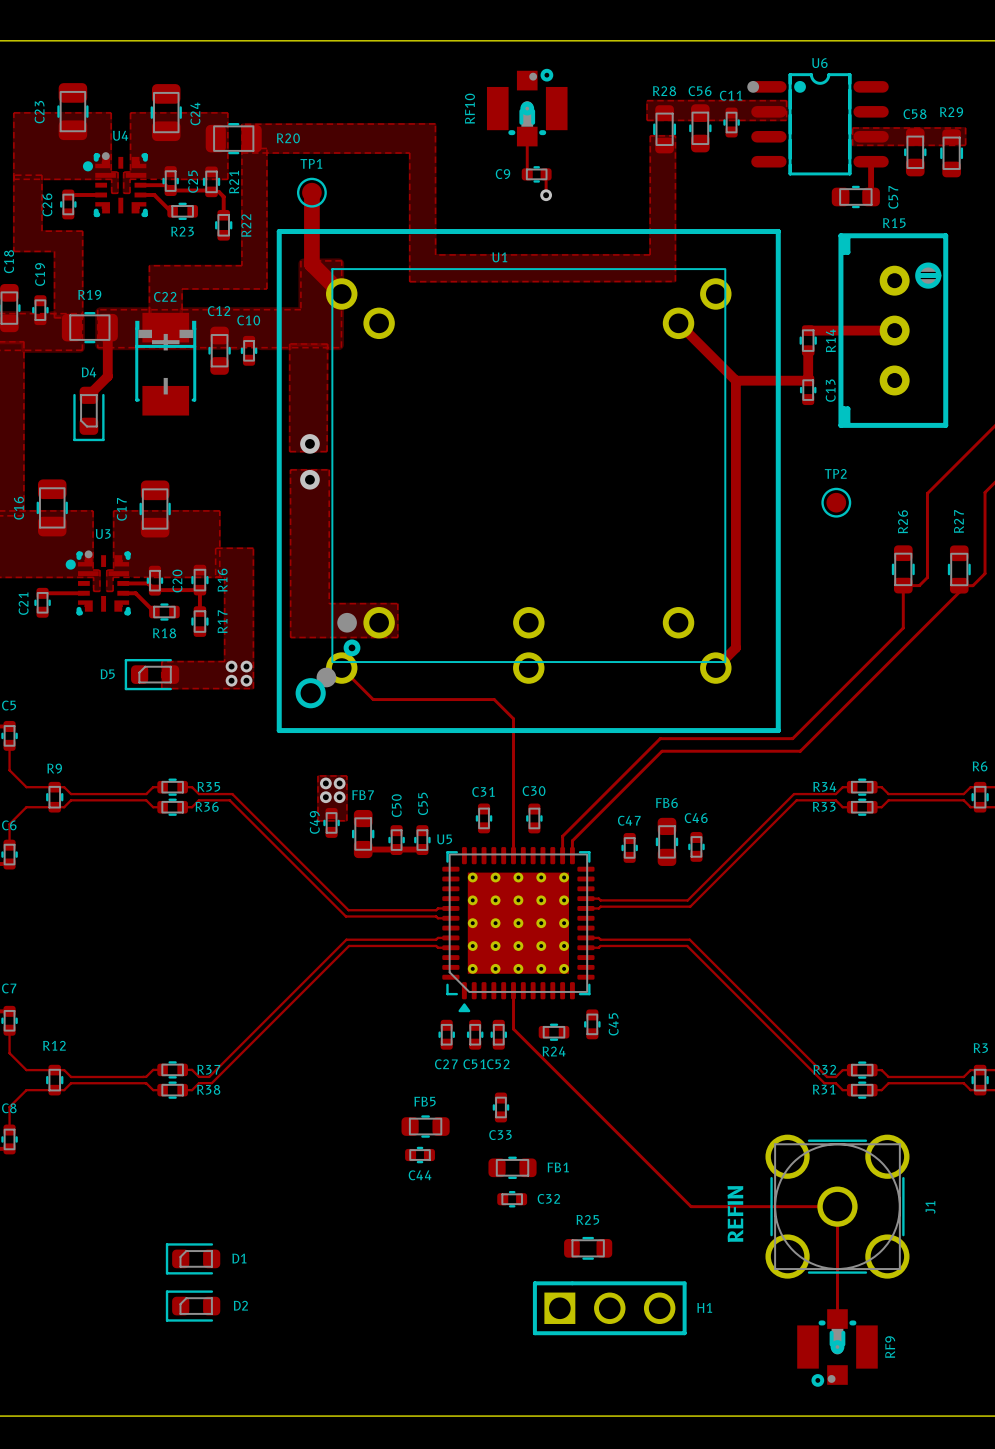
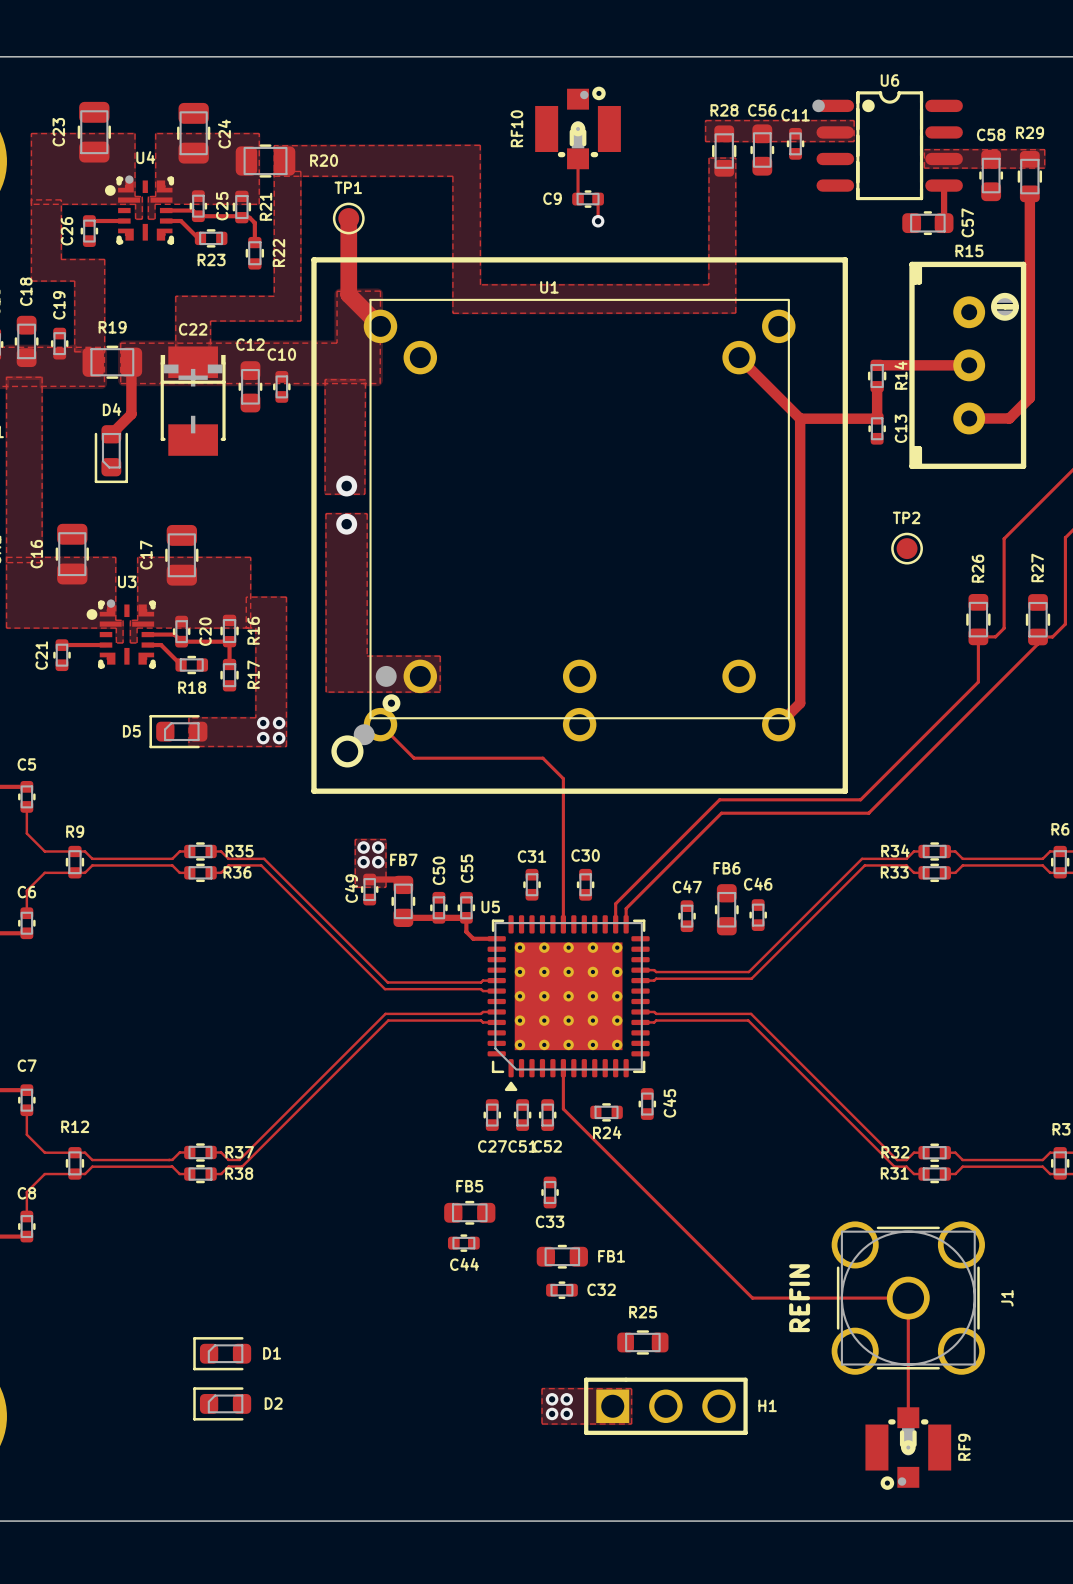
track: none -> (1029, 193) (1029, 397) (1009, 418) (969, 418)
track: none -> (369, 879) (397, 879) (403, 884)
track: none -> (466, 917) (466, 931) (473, 938) (496, 938)
zone outline: none -> (542, 1388) (631, 1388) (631, 1424) (542, 1424) (542, 1388)
via: none -> (552, 1399)
via: none -> (566, 1399)
via: none -> (552, 1413)
via: none -> (566, 1413)

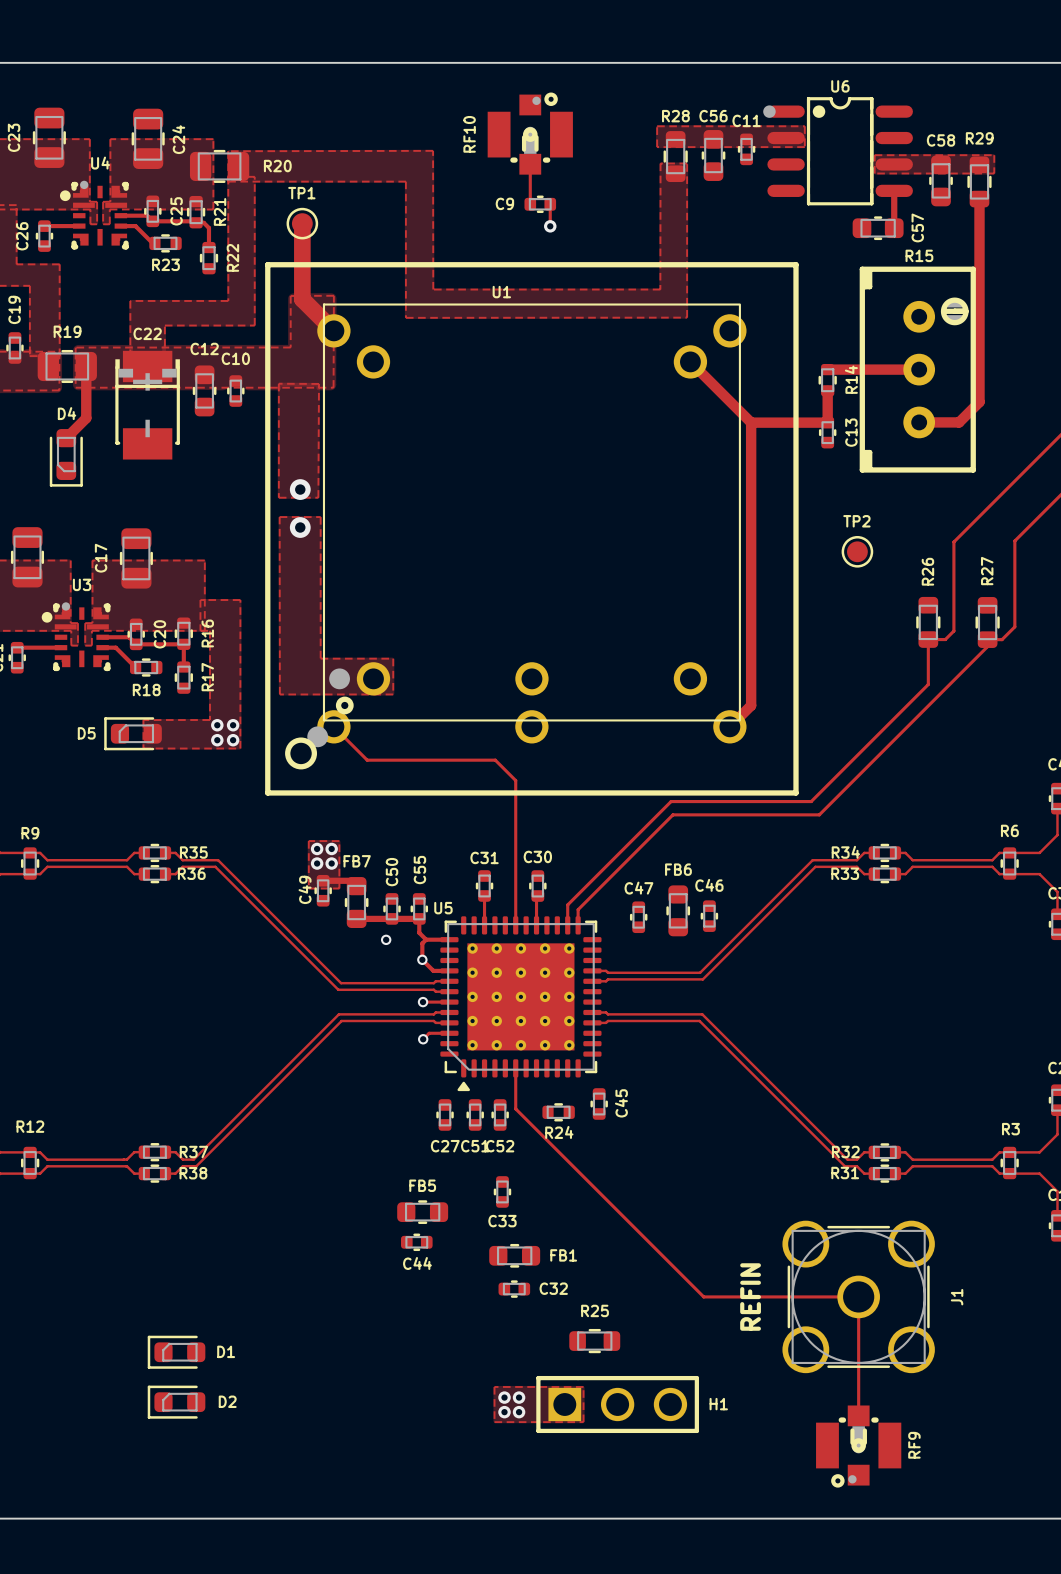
track: none -> (484, 896) (484, 925)
track: none -> (536, 895) (536, 925)
via: none -> (386, 939)
track: none -> (426, 939) (422, 943) (422, 959) (433, 970) (449, 970)
via: none -> (422, 959)
track: none -> (423, 1002) (449, 1002)
via: none -> (423, 1002)
track: none -> (449, 1033) (429, 1033) (423, 1039)
via: none -> (423, 1039)

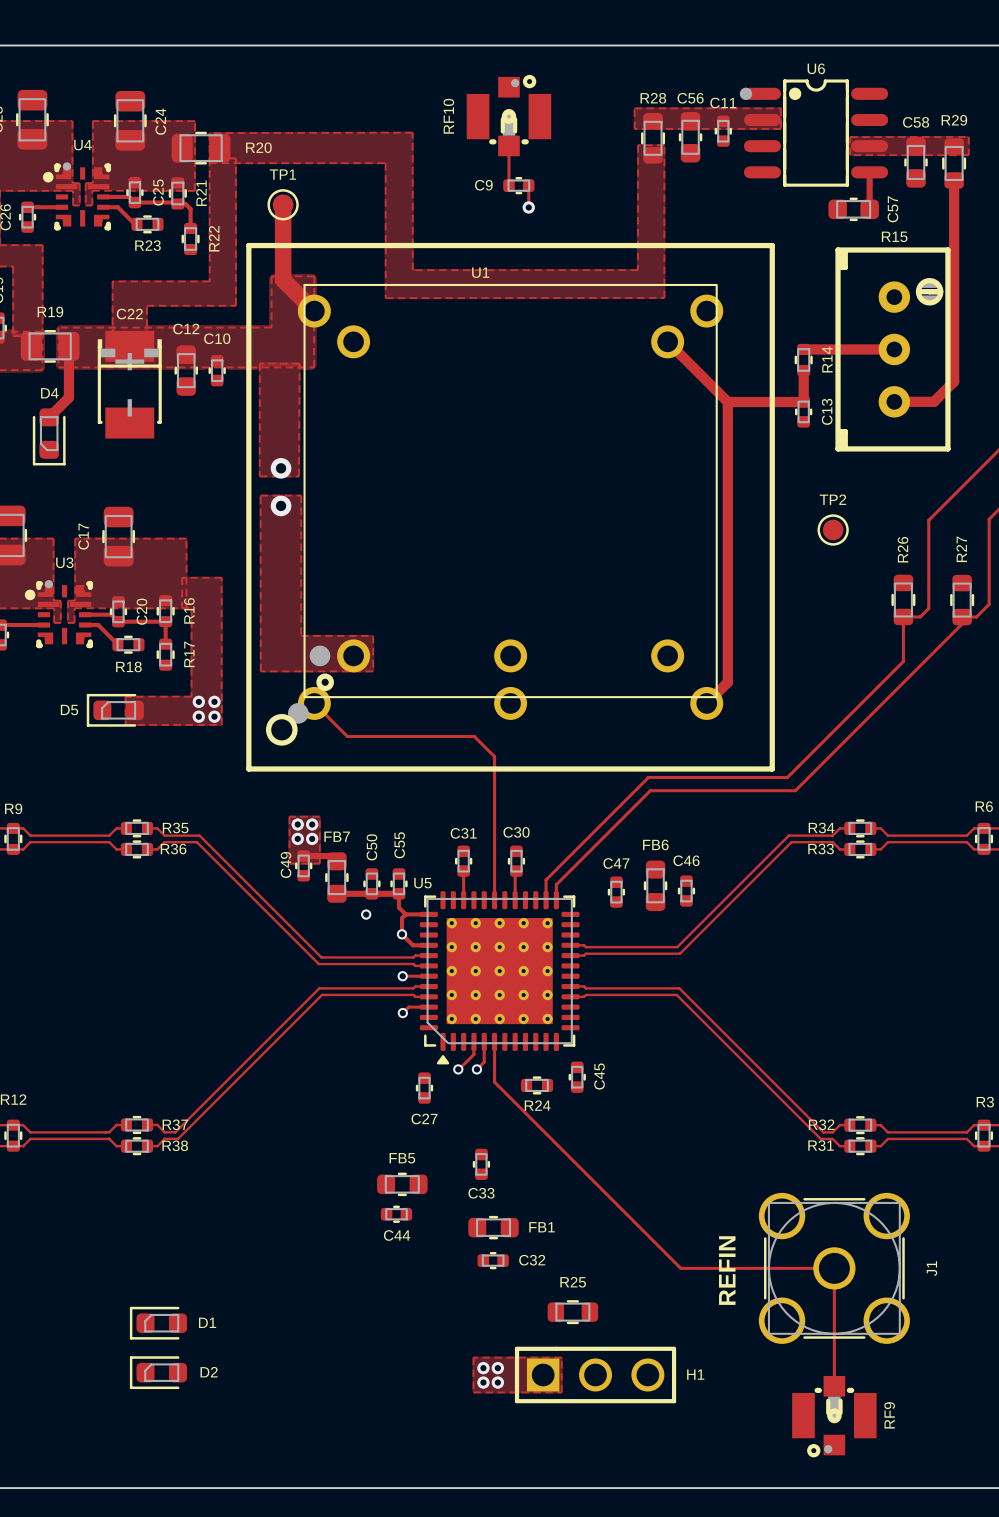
track: none -> (473, 1041) (473, 1054) (458, 1069)
track: none -> (484, 1041) (484, 1062) (476, 1069)
via: none -> (458, 1069)
via: none -> (476, 1069)
C51: (475, 1114) -> none
C52: (500, 1114) -> none

